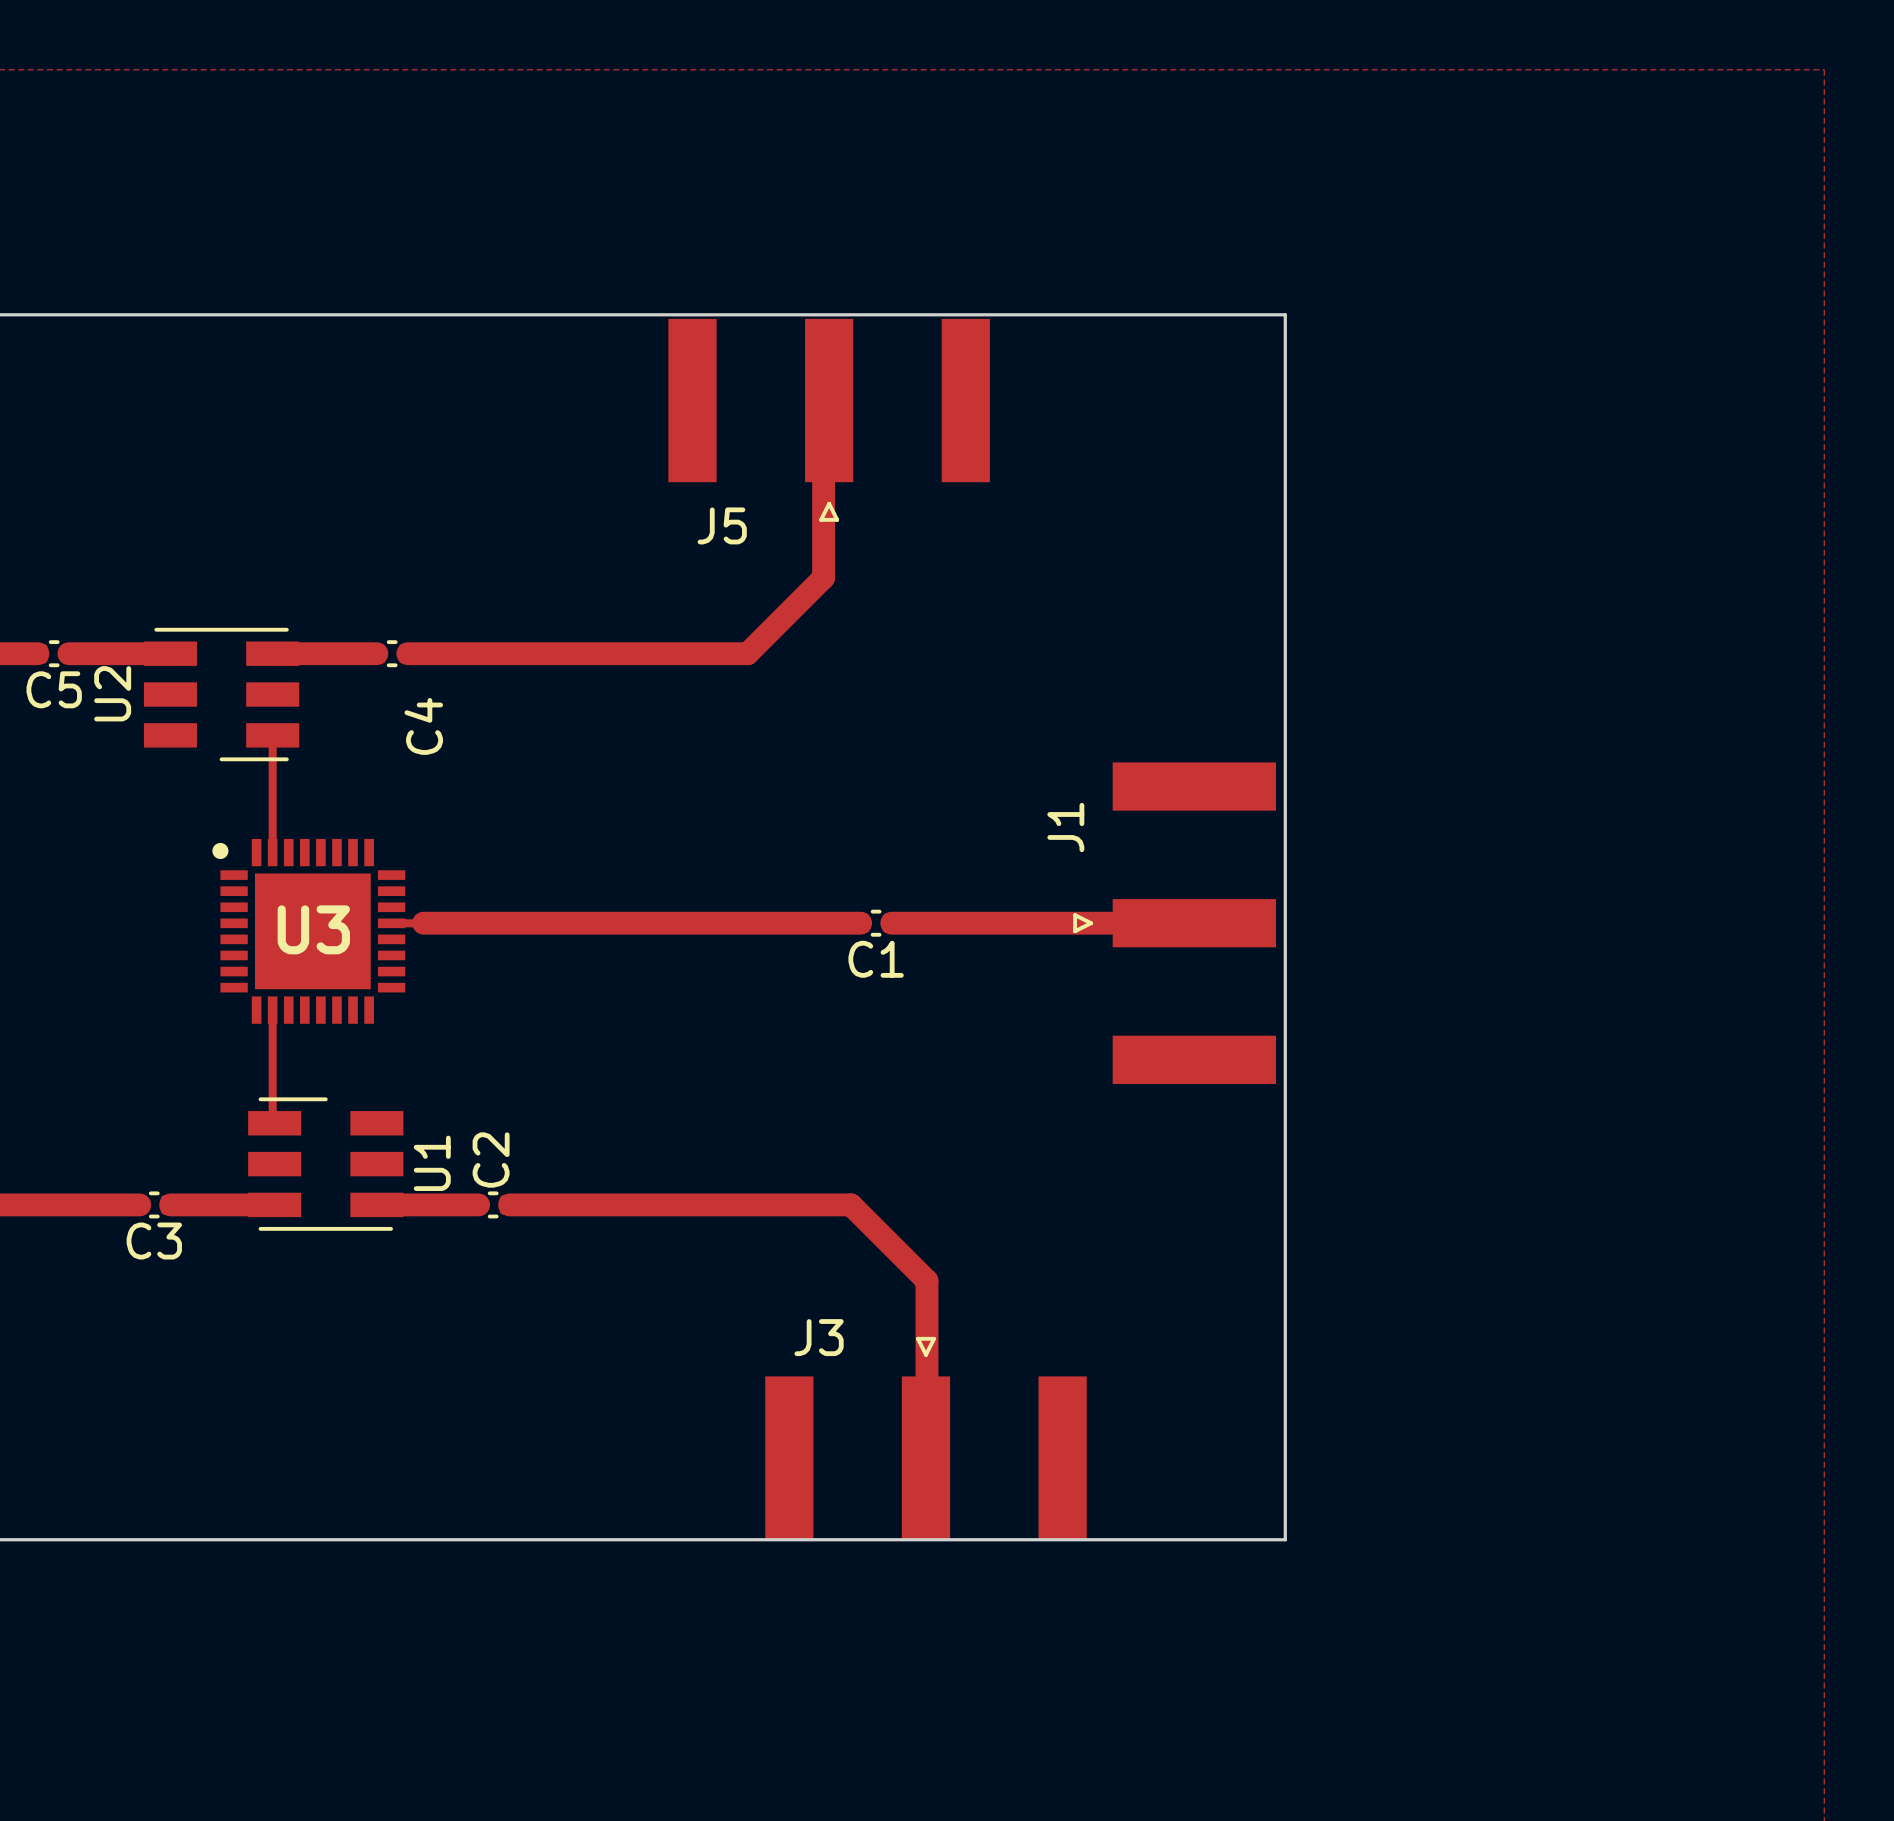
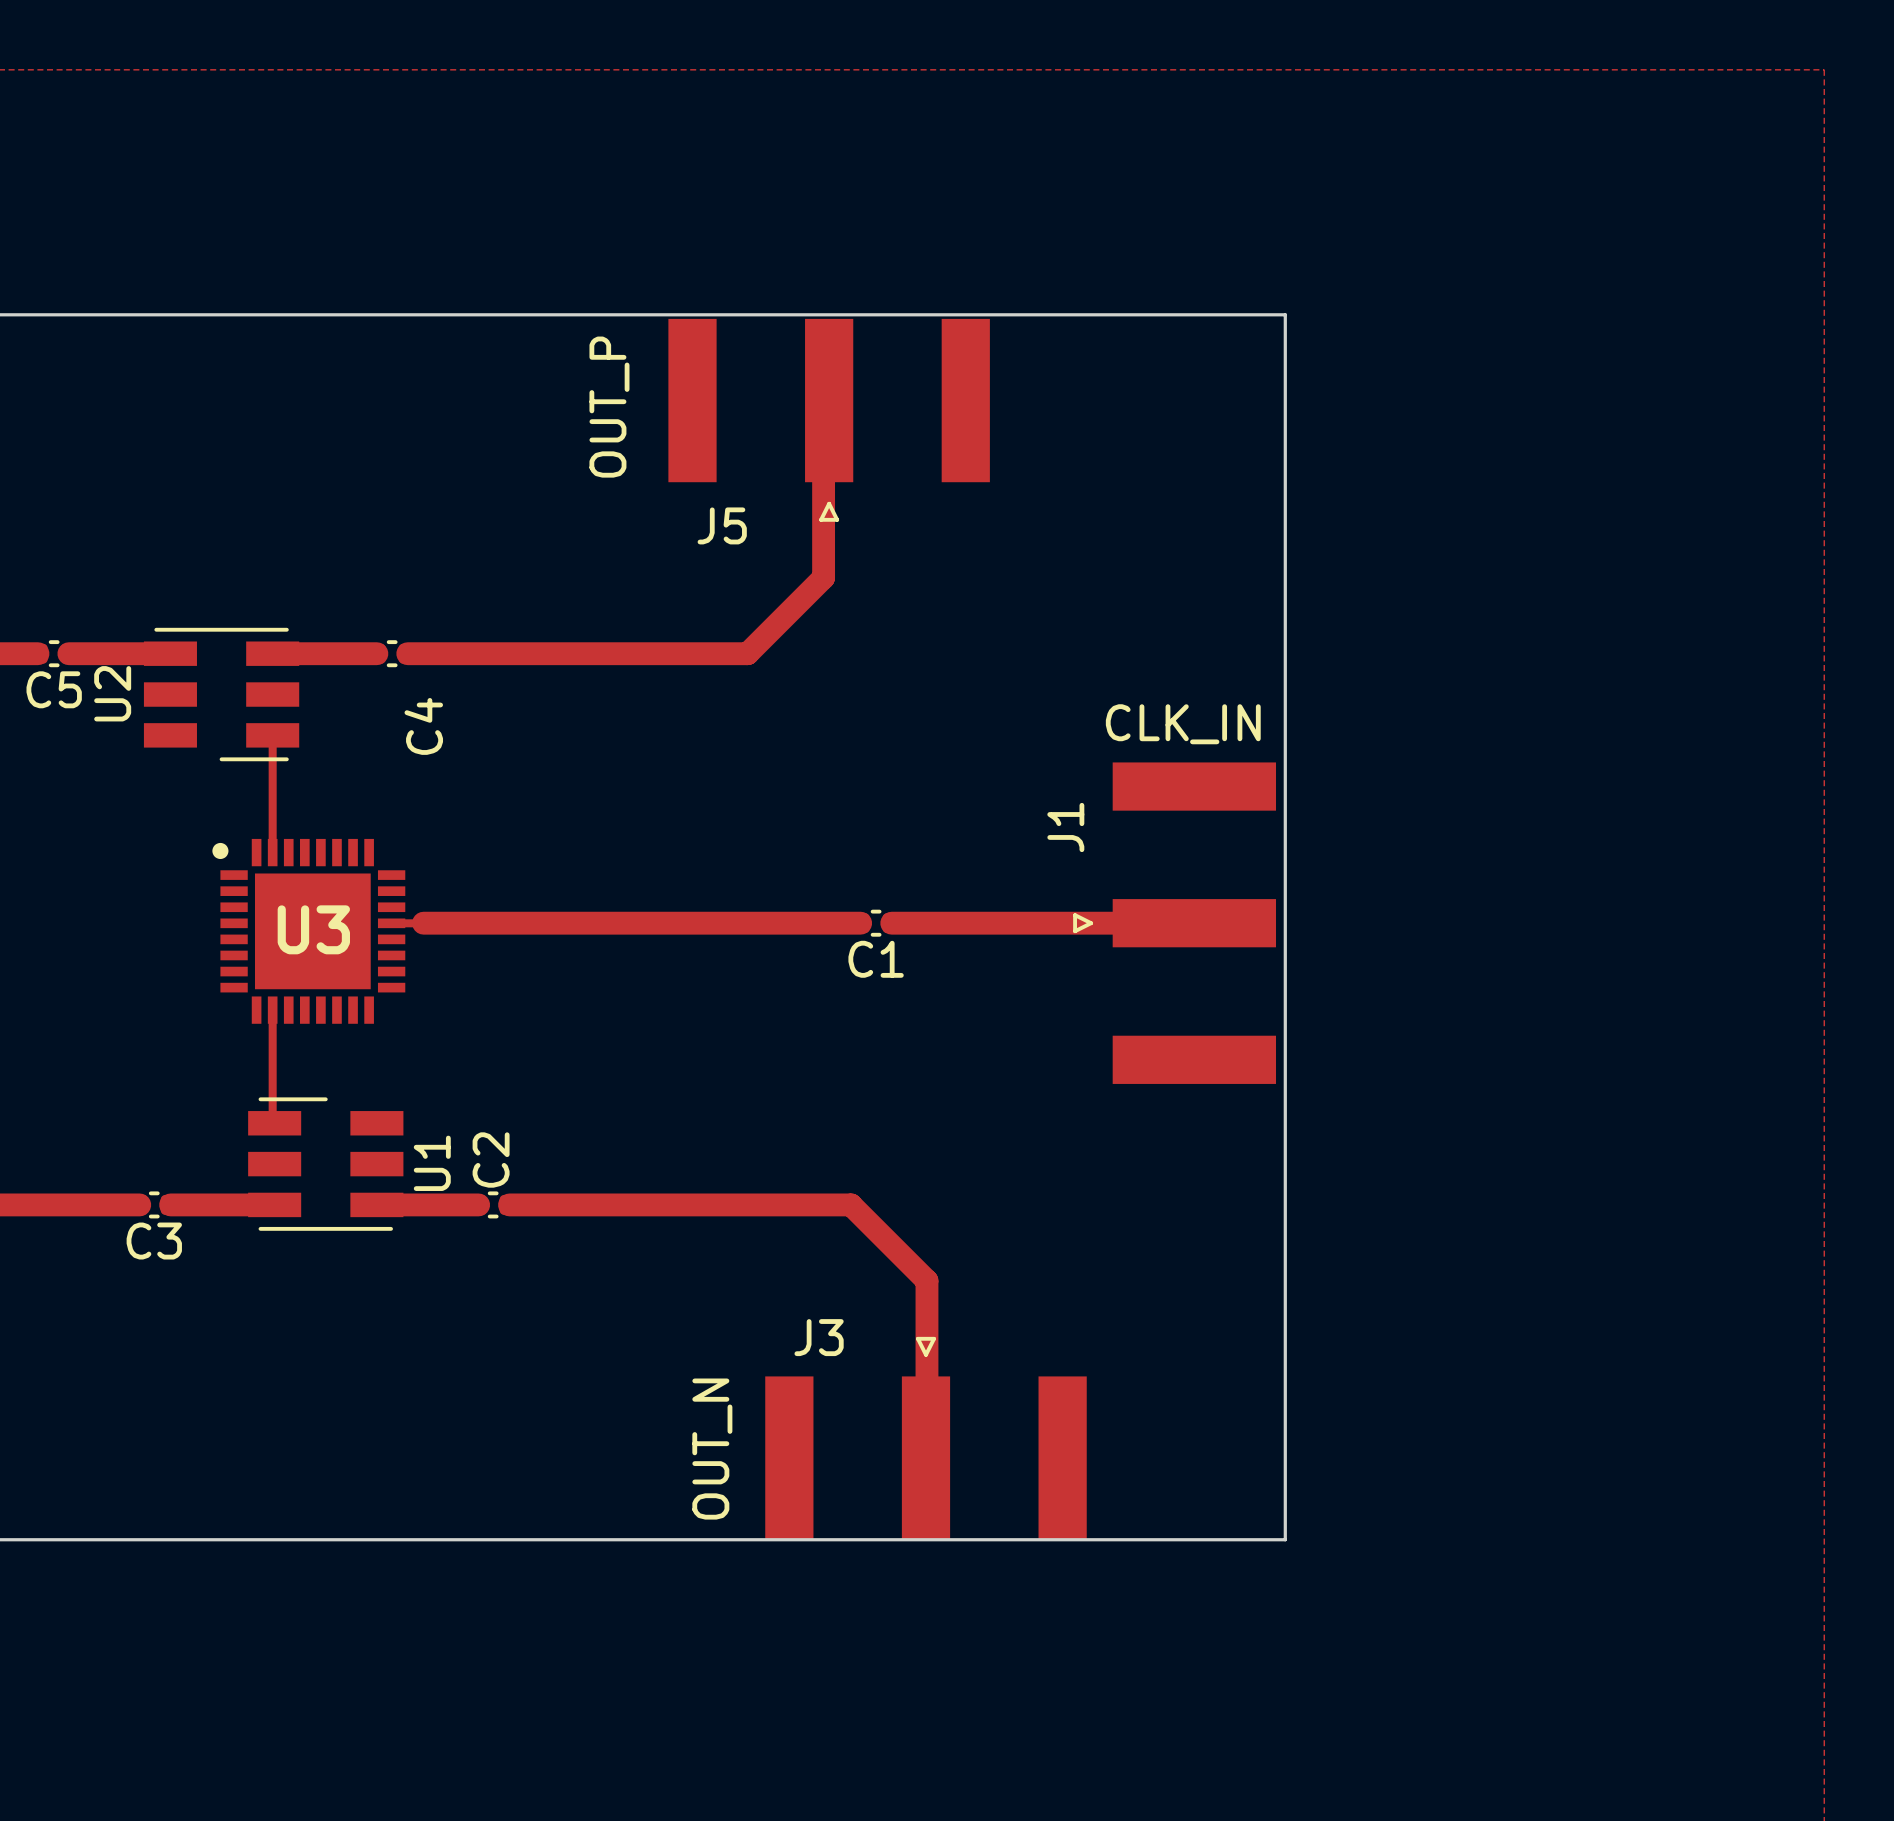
text: none -> OUT_P (609, 407)
text: none -> CLK_IN (1183, 724)
text: none -> OUT_N (712, 1449)

